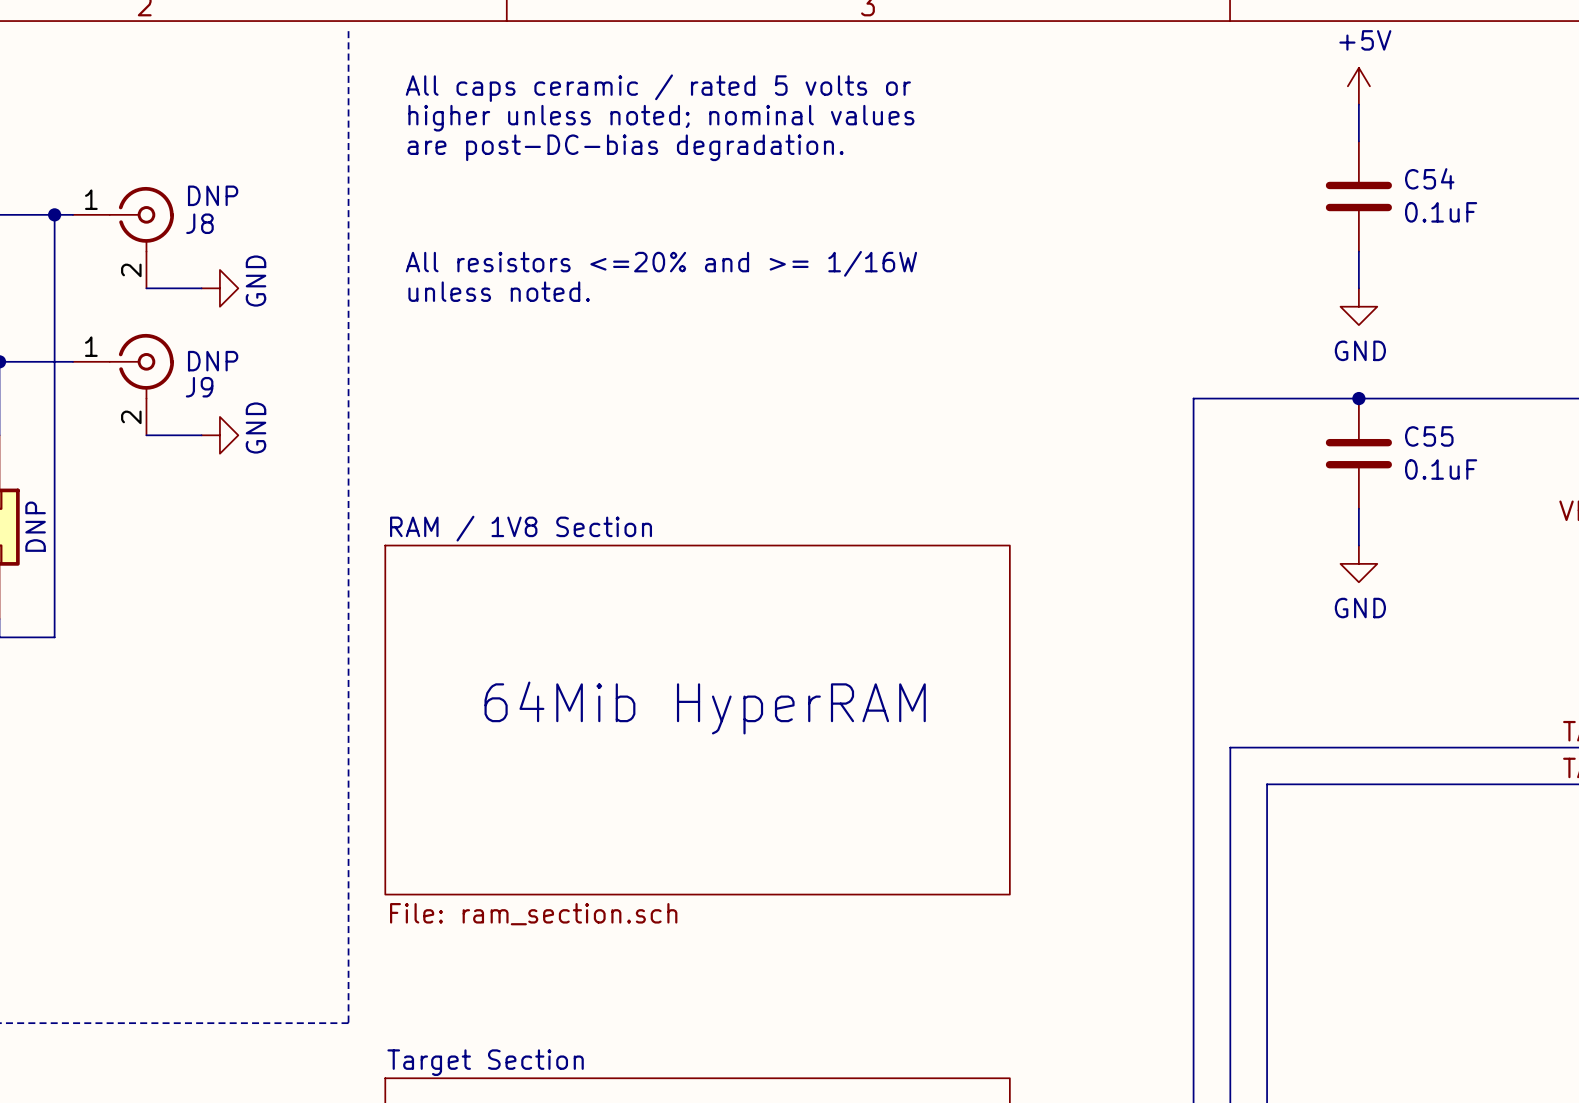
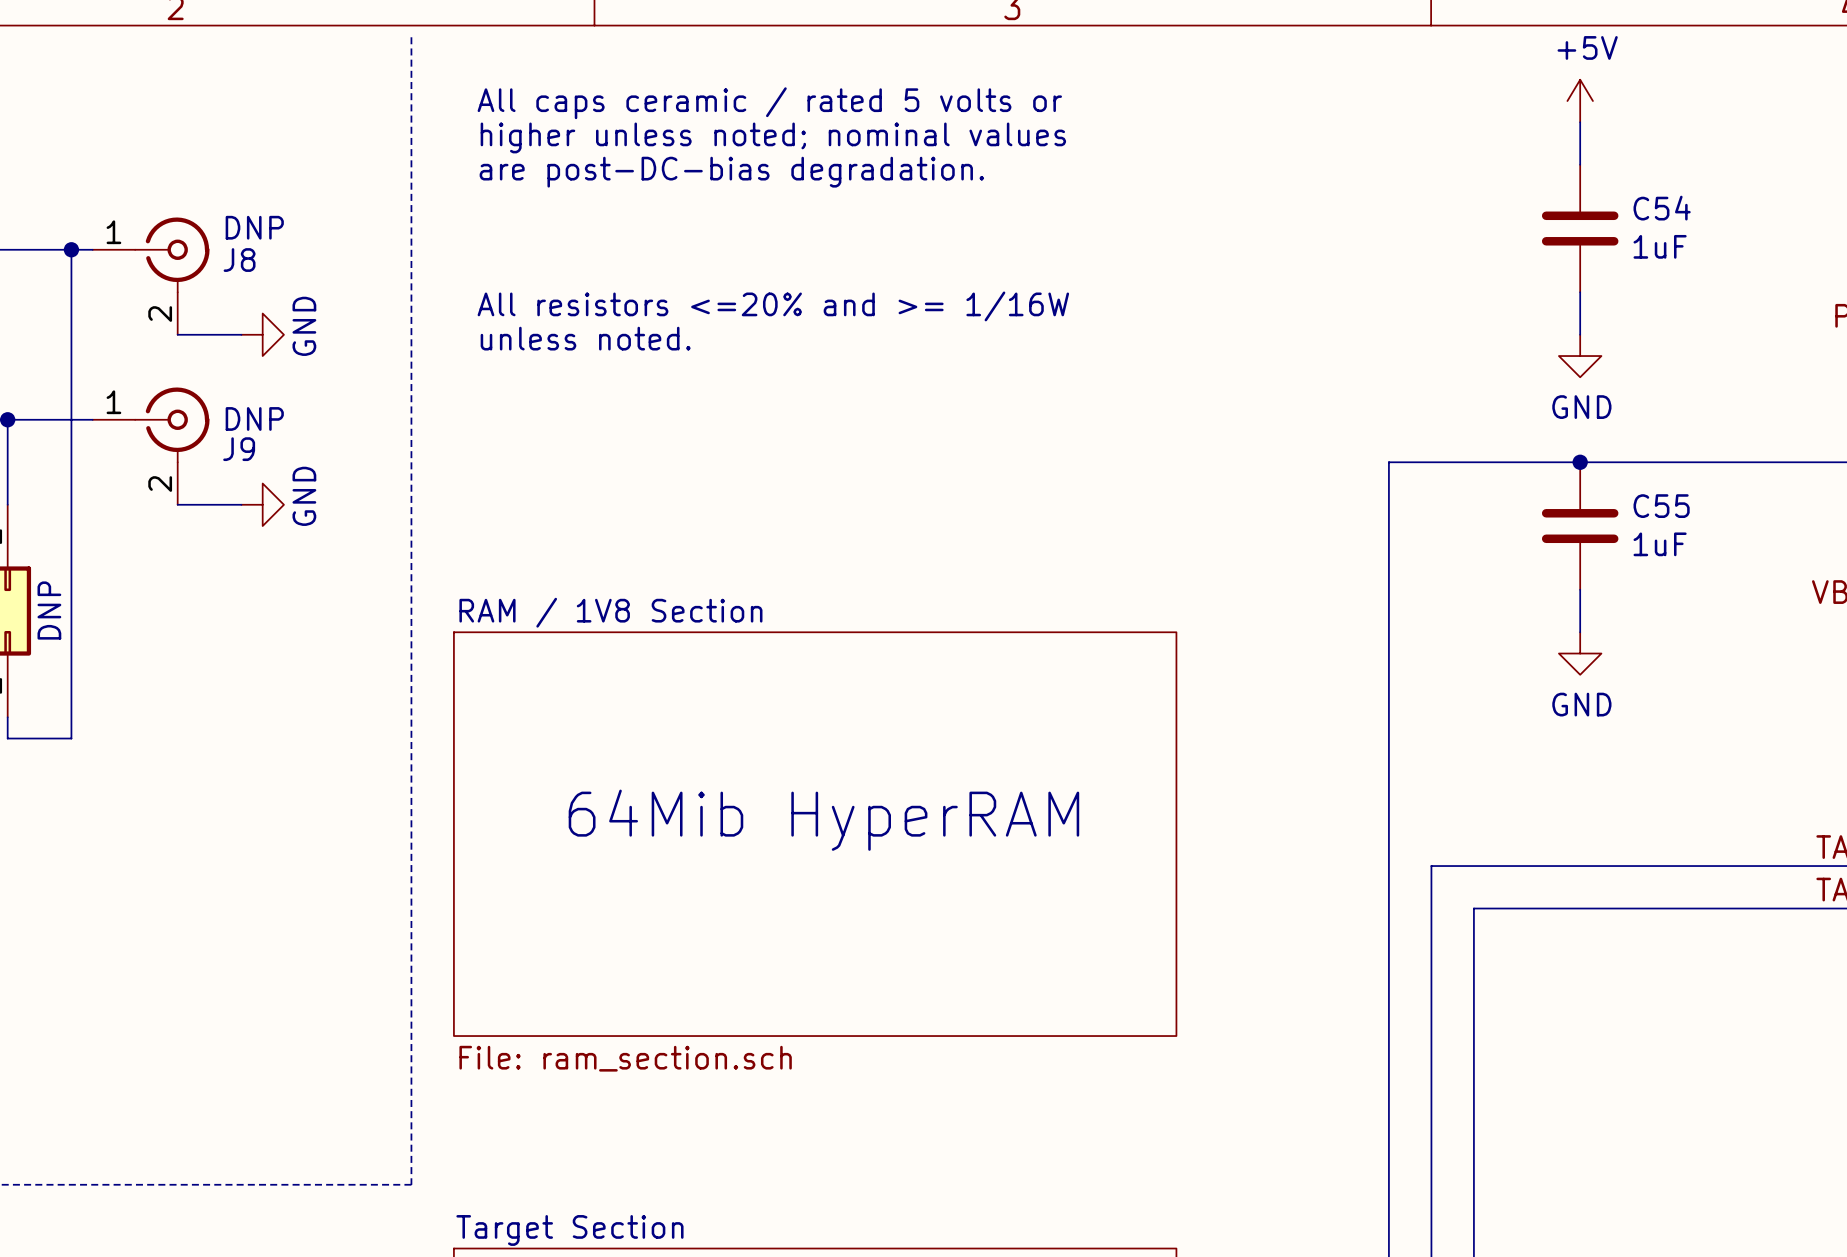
C54 value: 0.1uF (1441, 212) -> 1uF (1660, 246)
C55 value: 0.1uF (1441, 469) -> 1uF (1660, 544)

